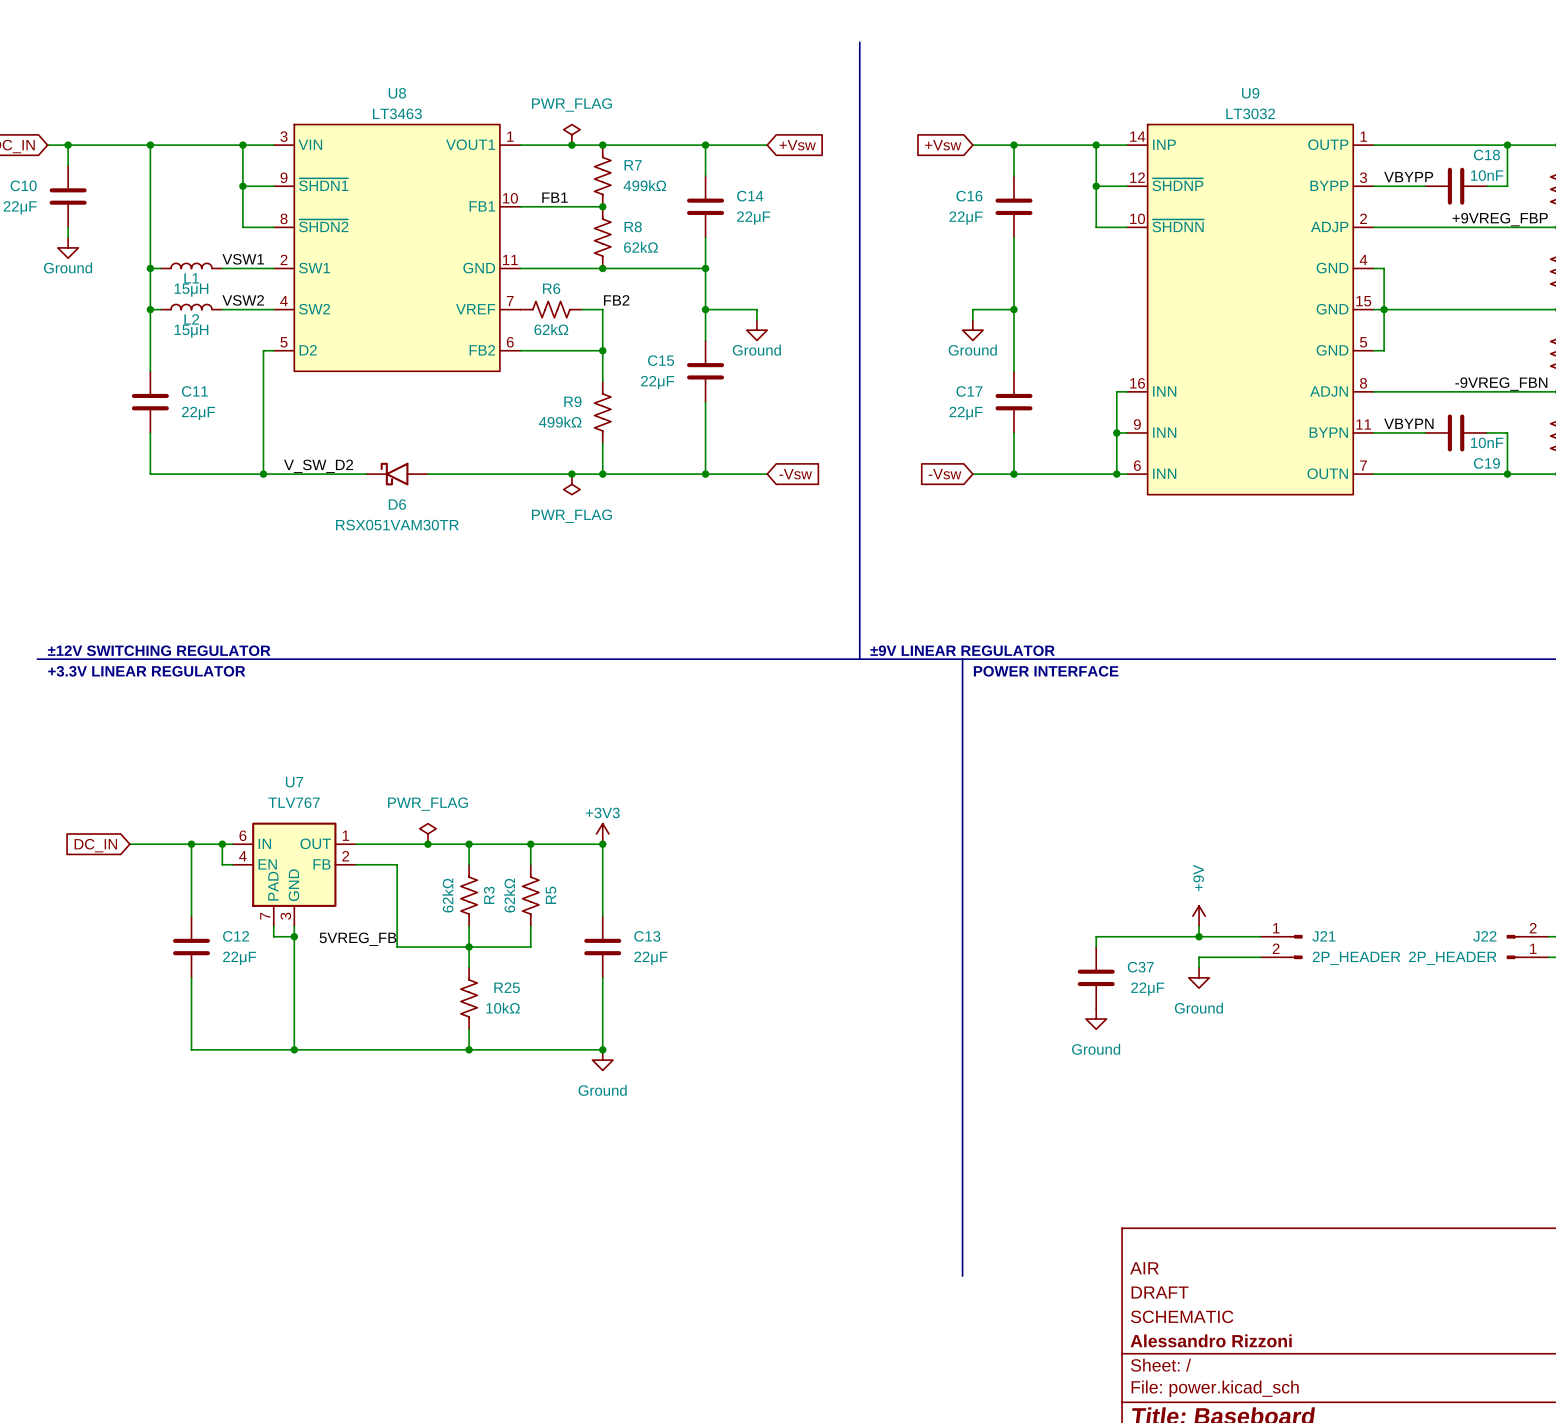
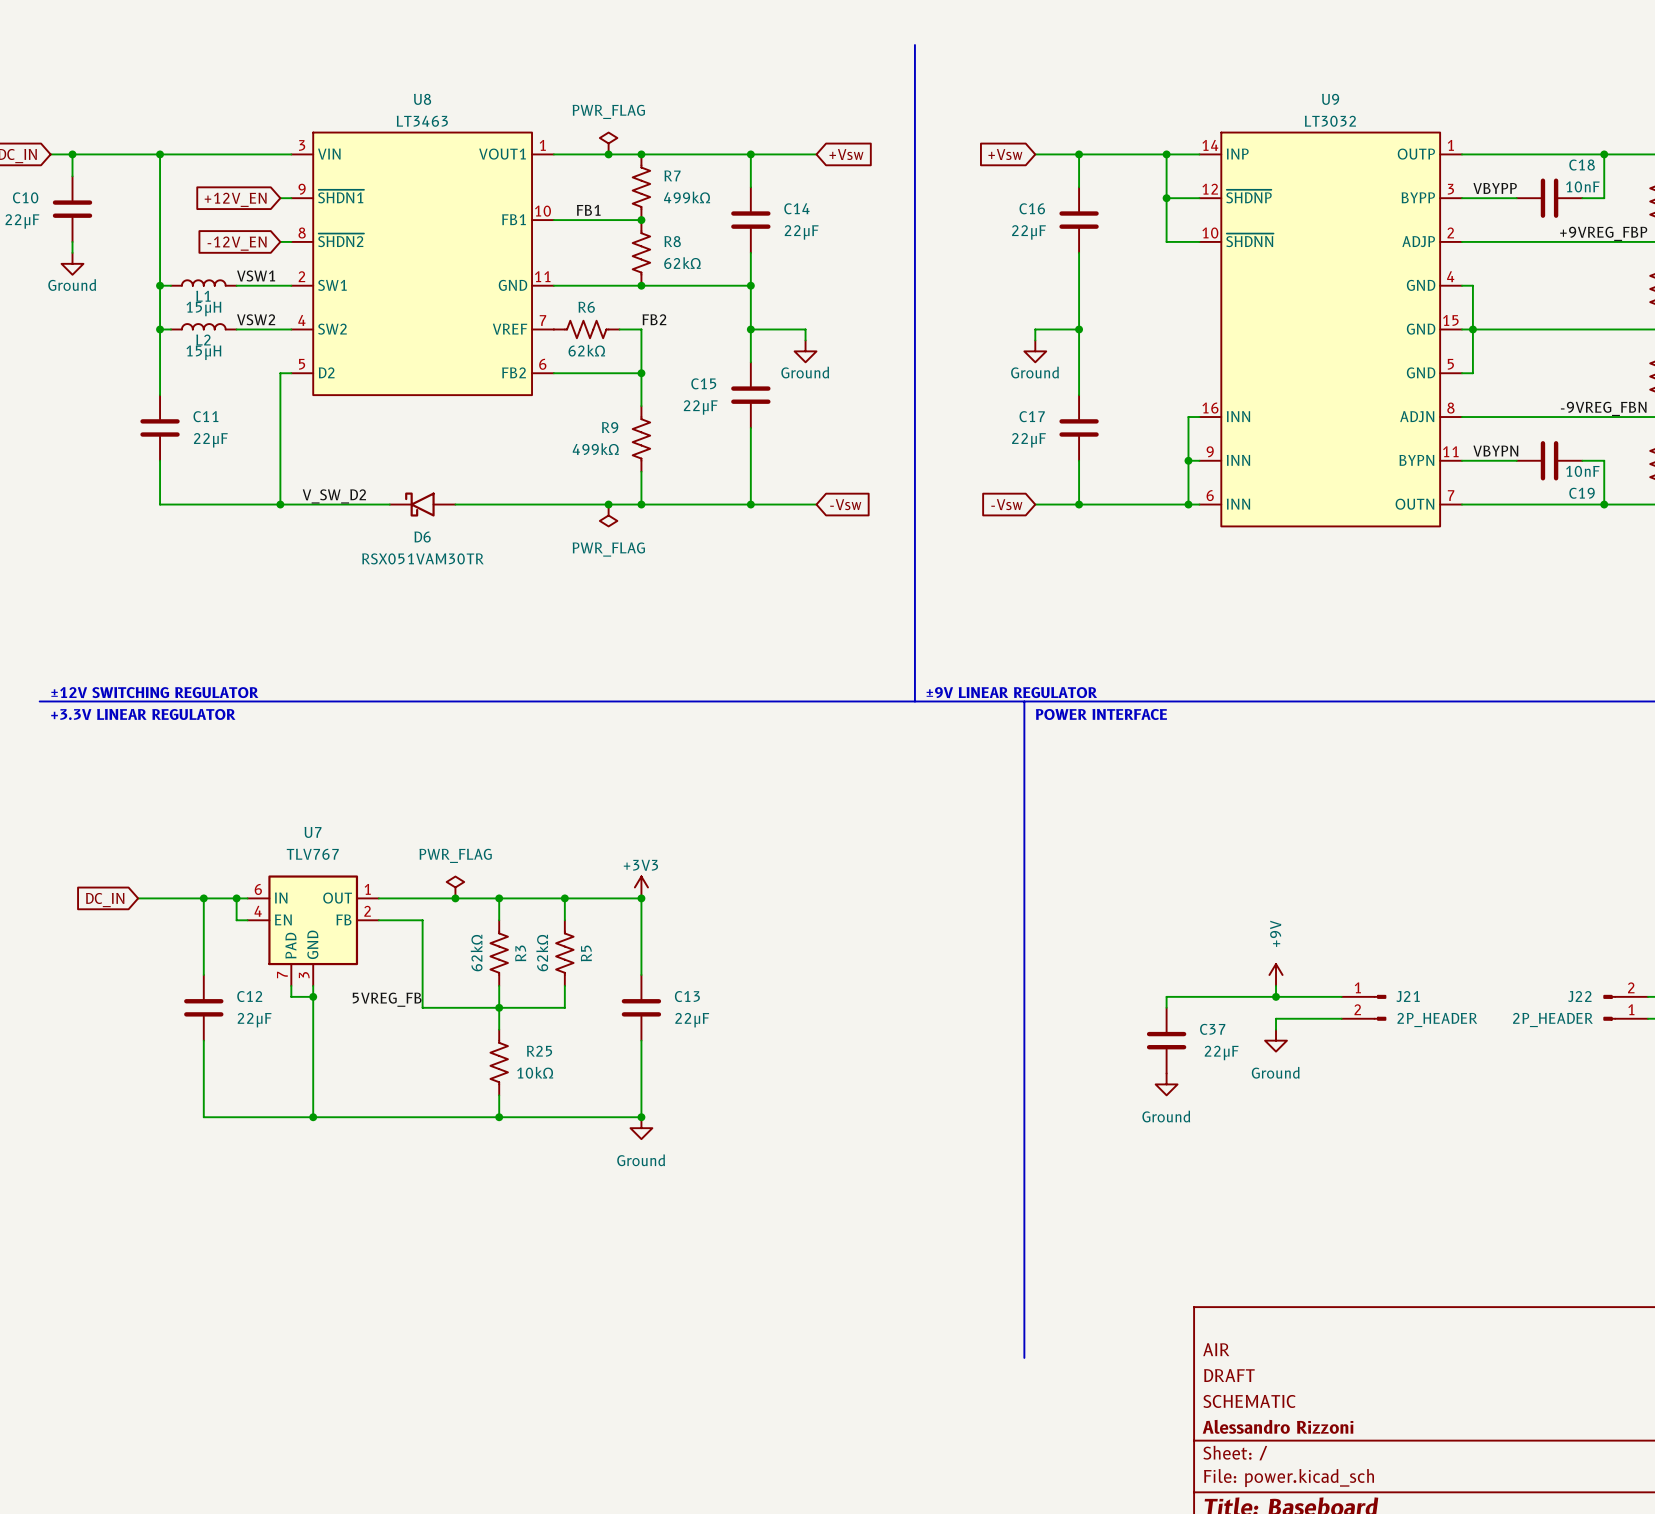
wire: (242, 145) (242, 227) (263, 227) -> none
junction: (242, 145) -> none
wire: (242, 186) (263, 186) -> none
junction: (242, 186) -> none
global label: none -> +12V_EN (235, 199)
global label: none -> -12V_EN (237, 243)

